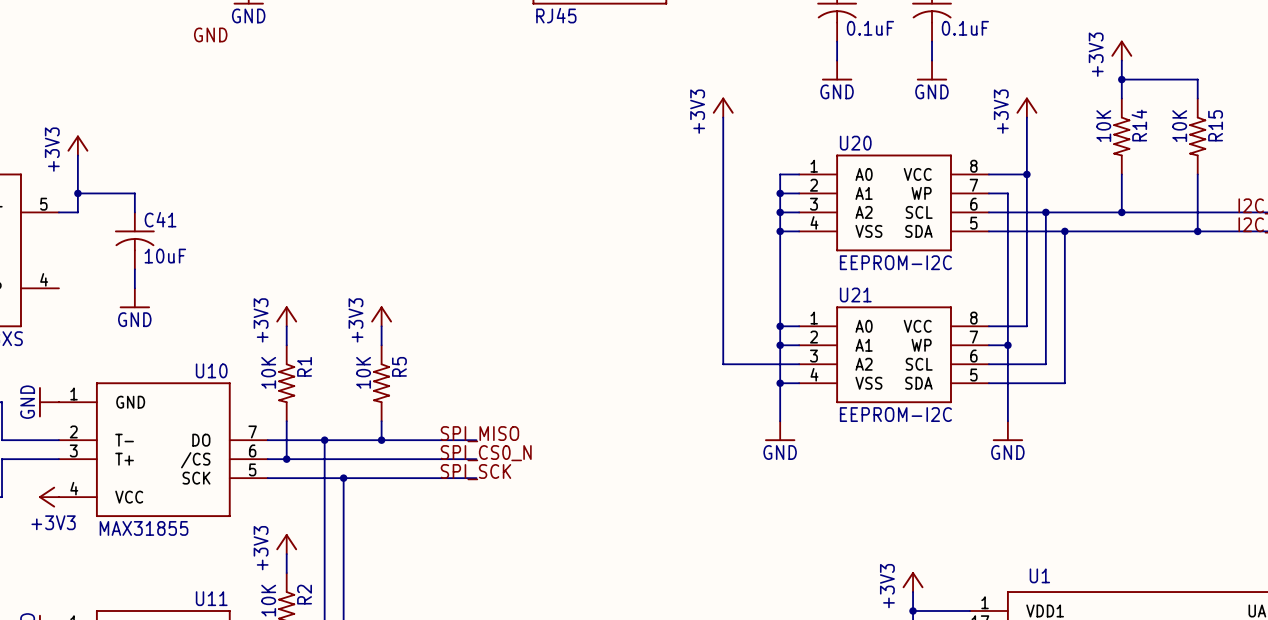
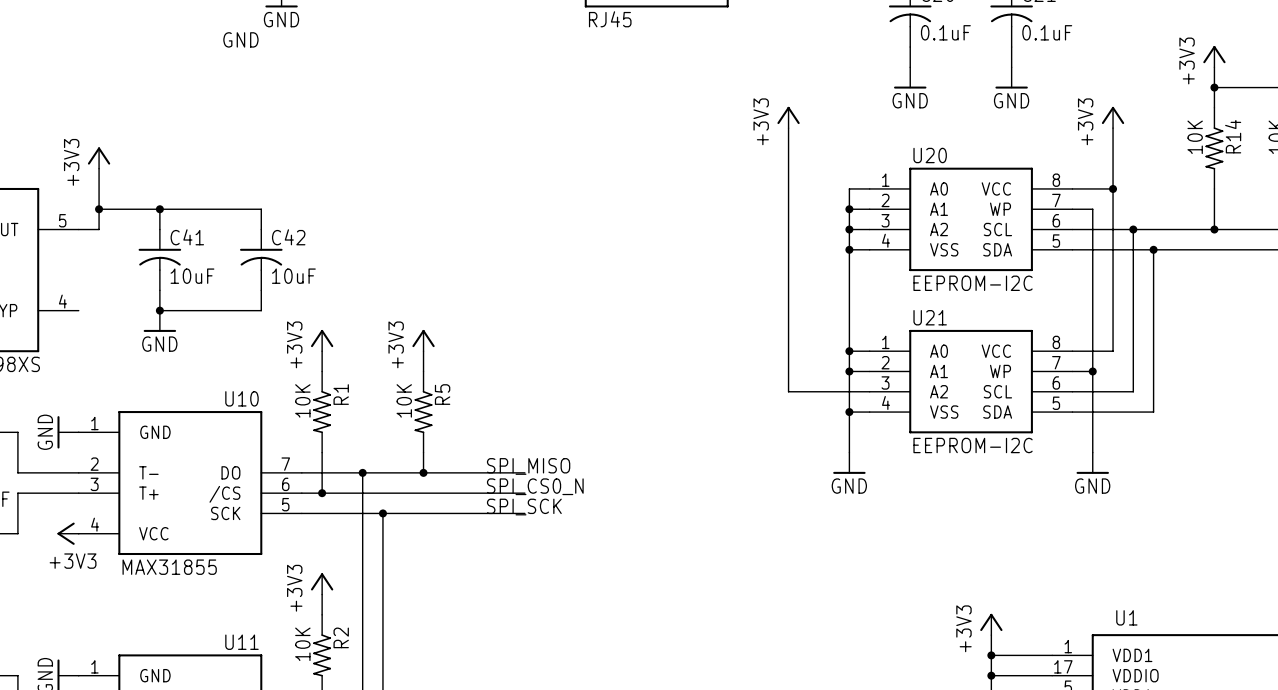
wire: none -> (159, 209) (261, 209) (261, 229)
junction: none -> (159, 209)
C42: none -> 10uF (261, 259)
wire: none -> (261, 290) (261, 310) (159, 310)
junction: none -> (159, 310)

